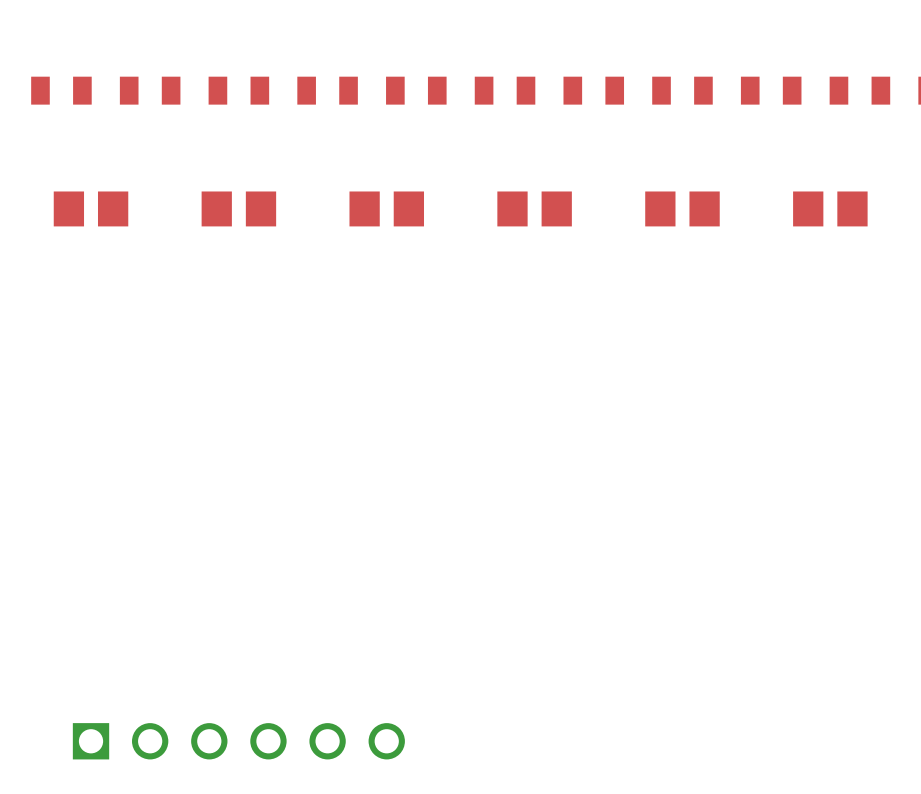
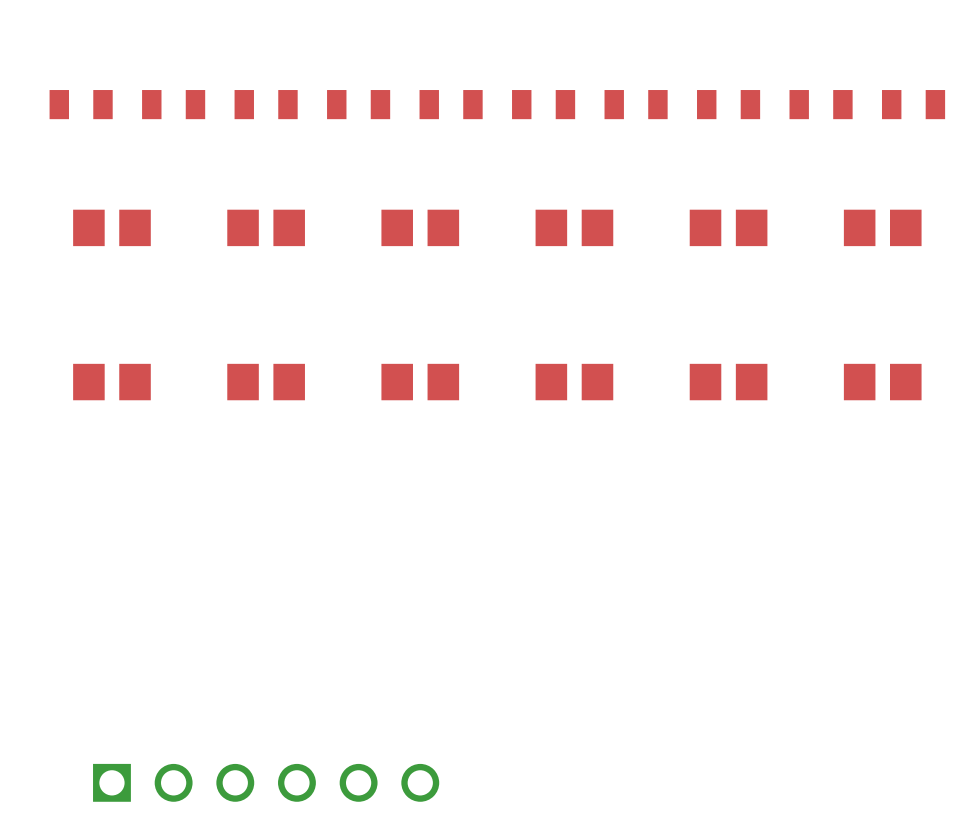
part: none -> (111, 382)
part: none -> (266, 382)
part: none -> (420, 382)
part: none -> (574, 382)
part: none -> (728, 382)
part: none -> (882, 382)

